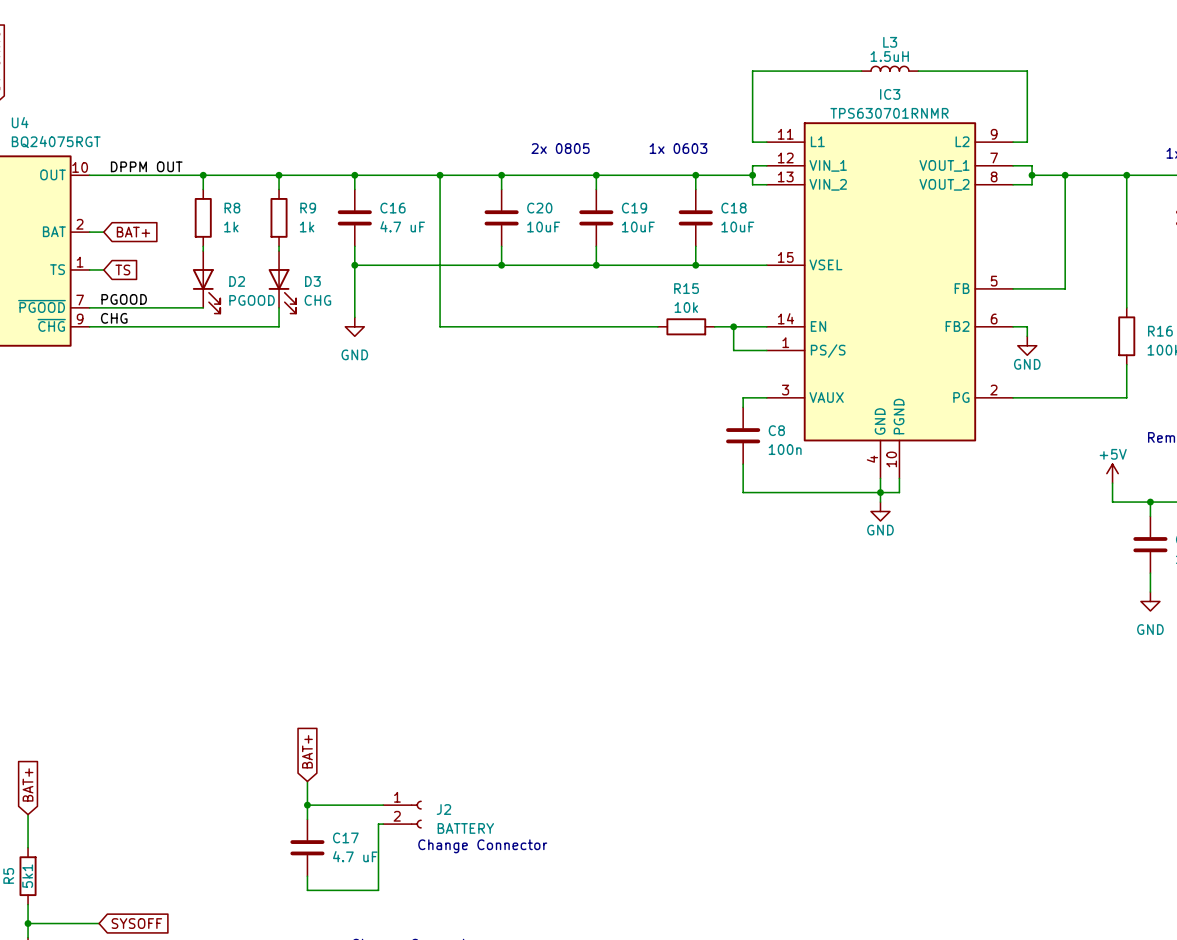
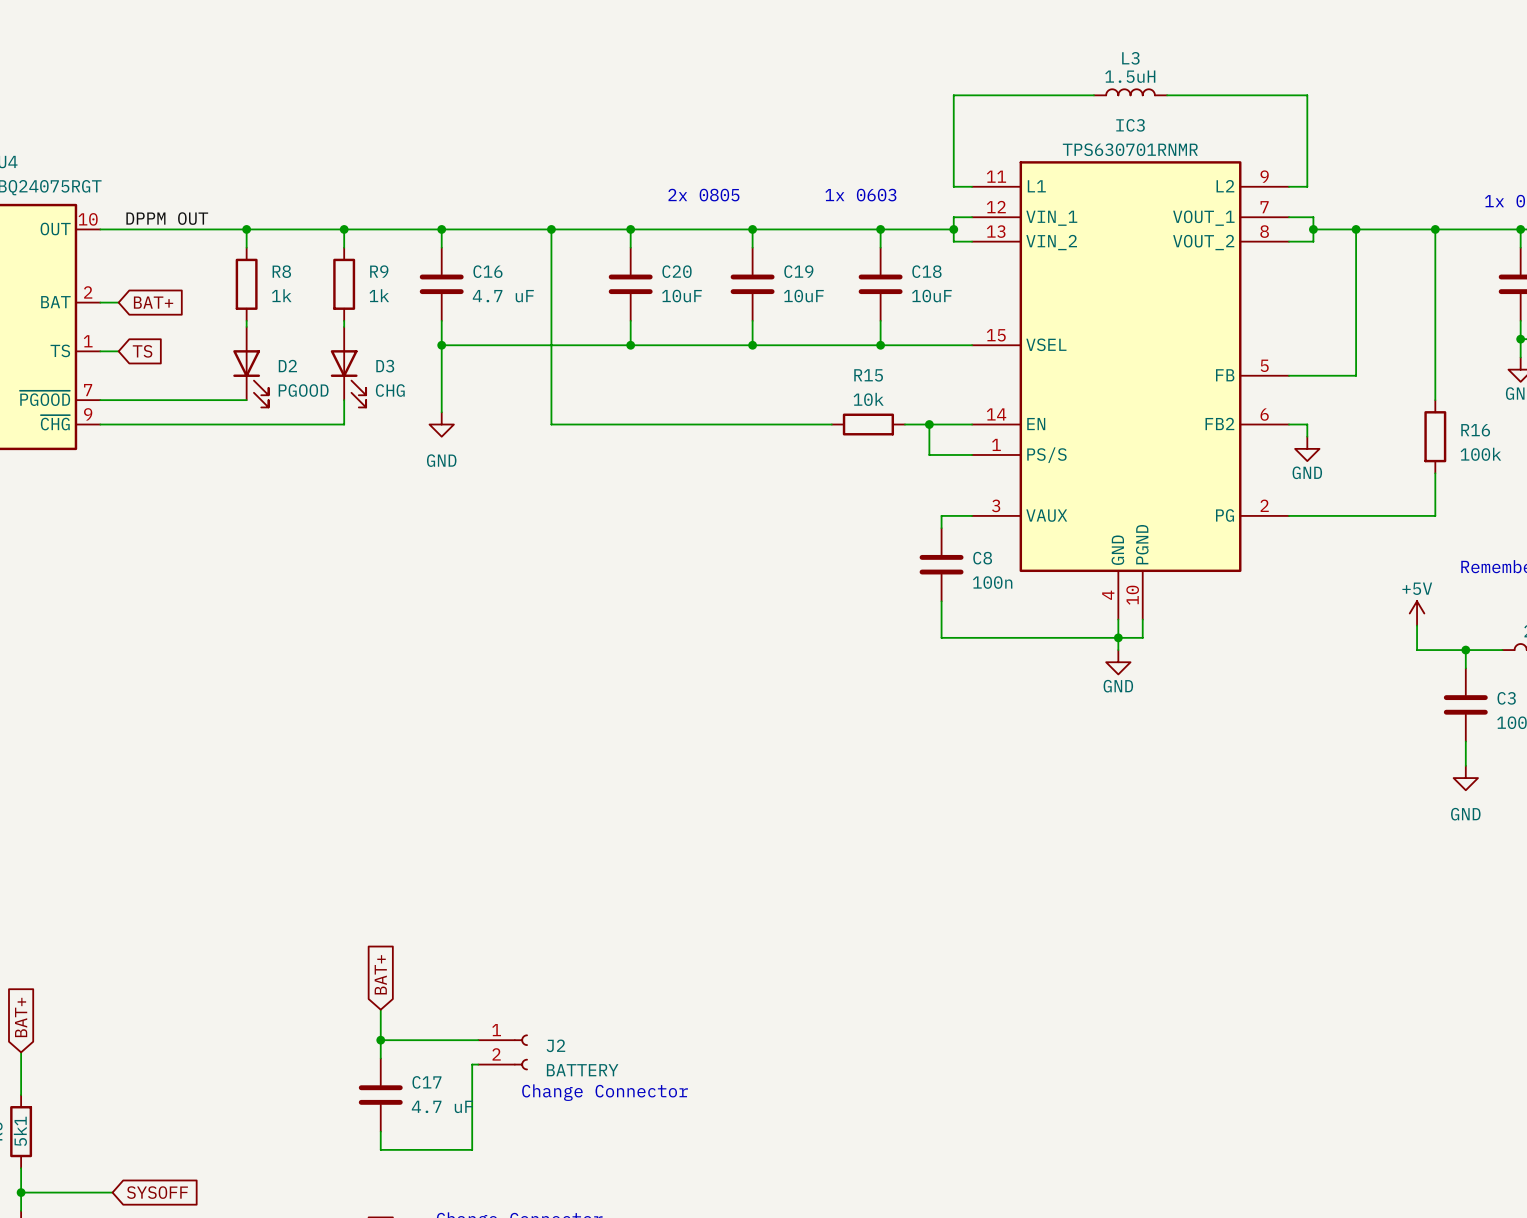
label: PGOOD (124, 299) -> none
label: CHG (114, 318) -> none

